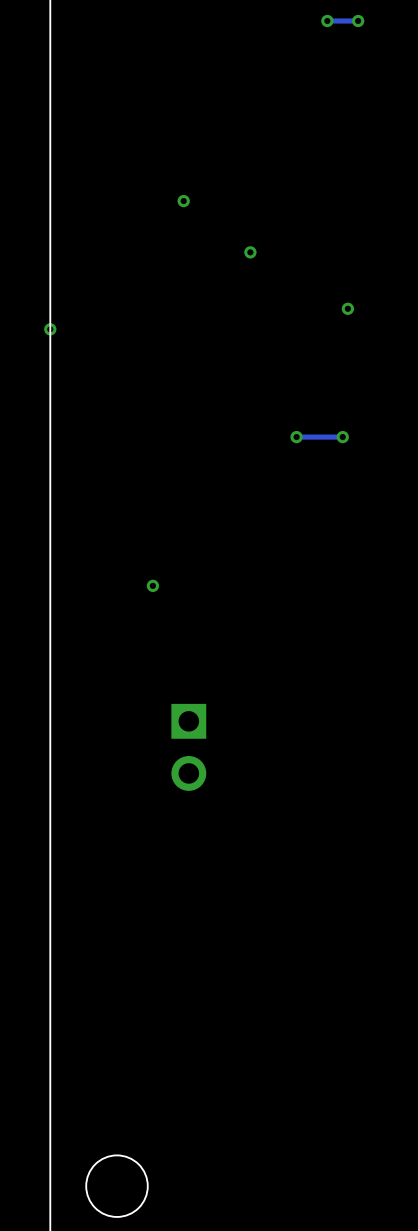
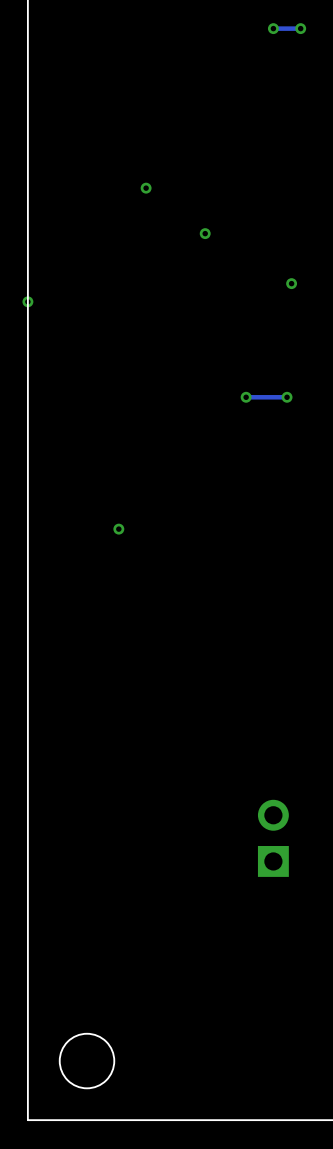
part rotation: 0° (188, 747) -> 180° (273, 838)
part position: (188, 747) -> (273, 838)

